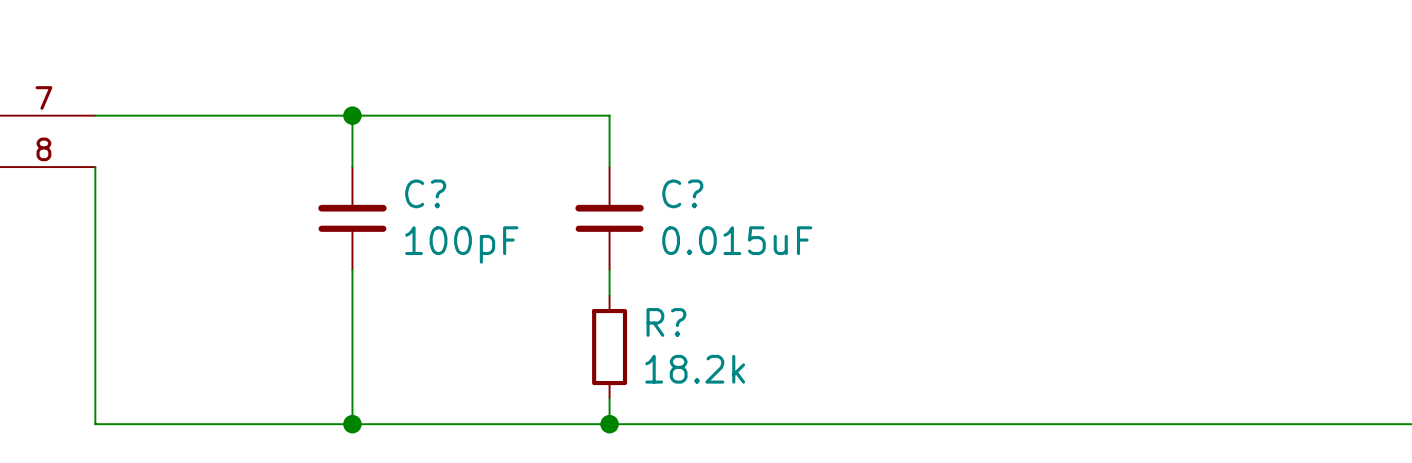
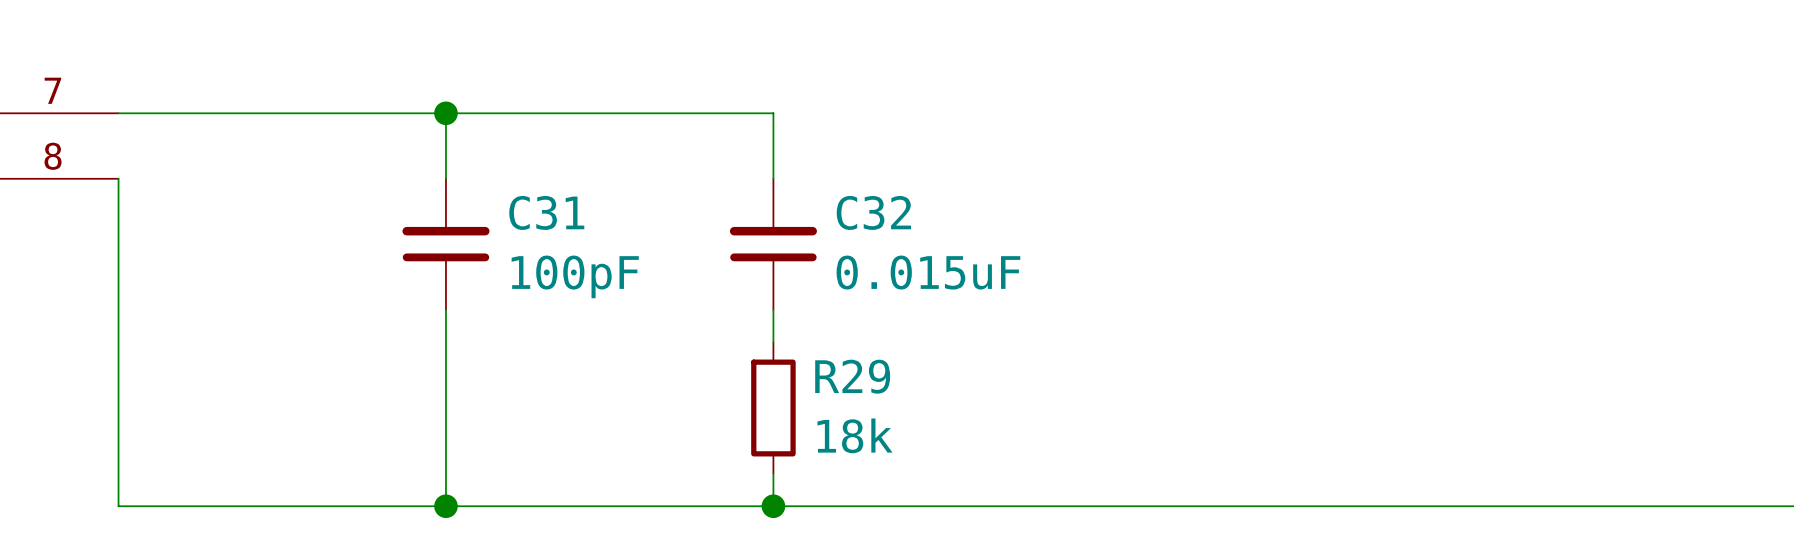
C? name: C? (425, 193) -> C31 (546, 212)
C? name: C? (682, 193) -> C32 (873, 212)
R? name: R? (666, 322) -> R29 (852, 376)
R? value: 18.2k (695, 369) -> 18k (854, 435)

